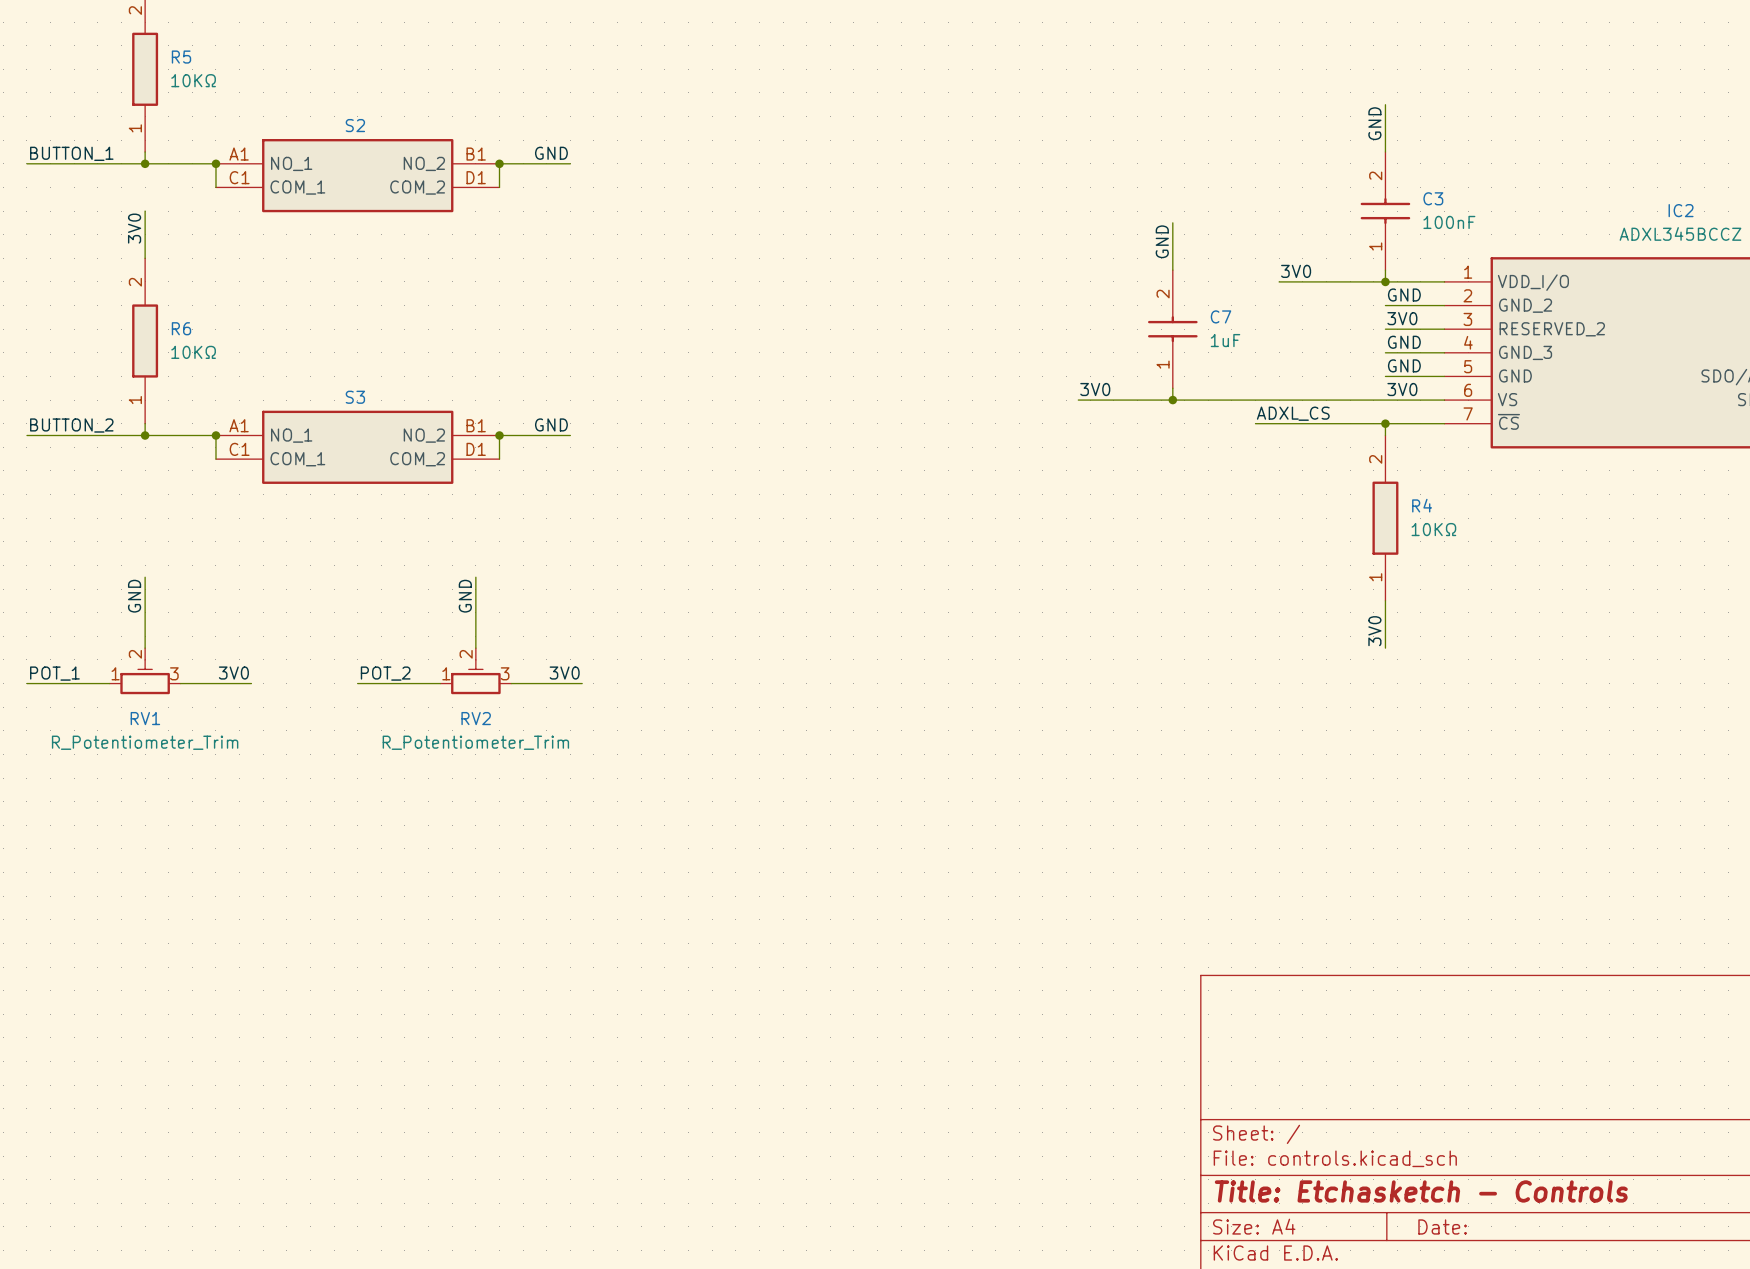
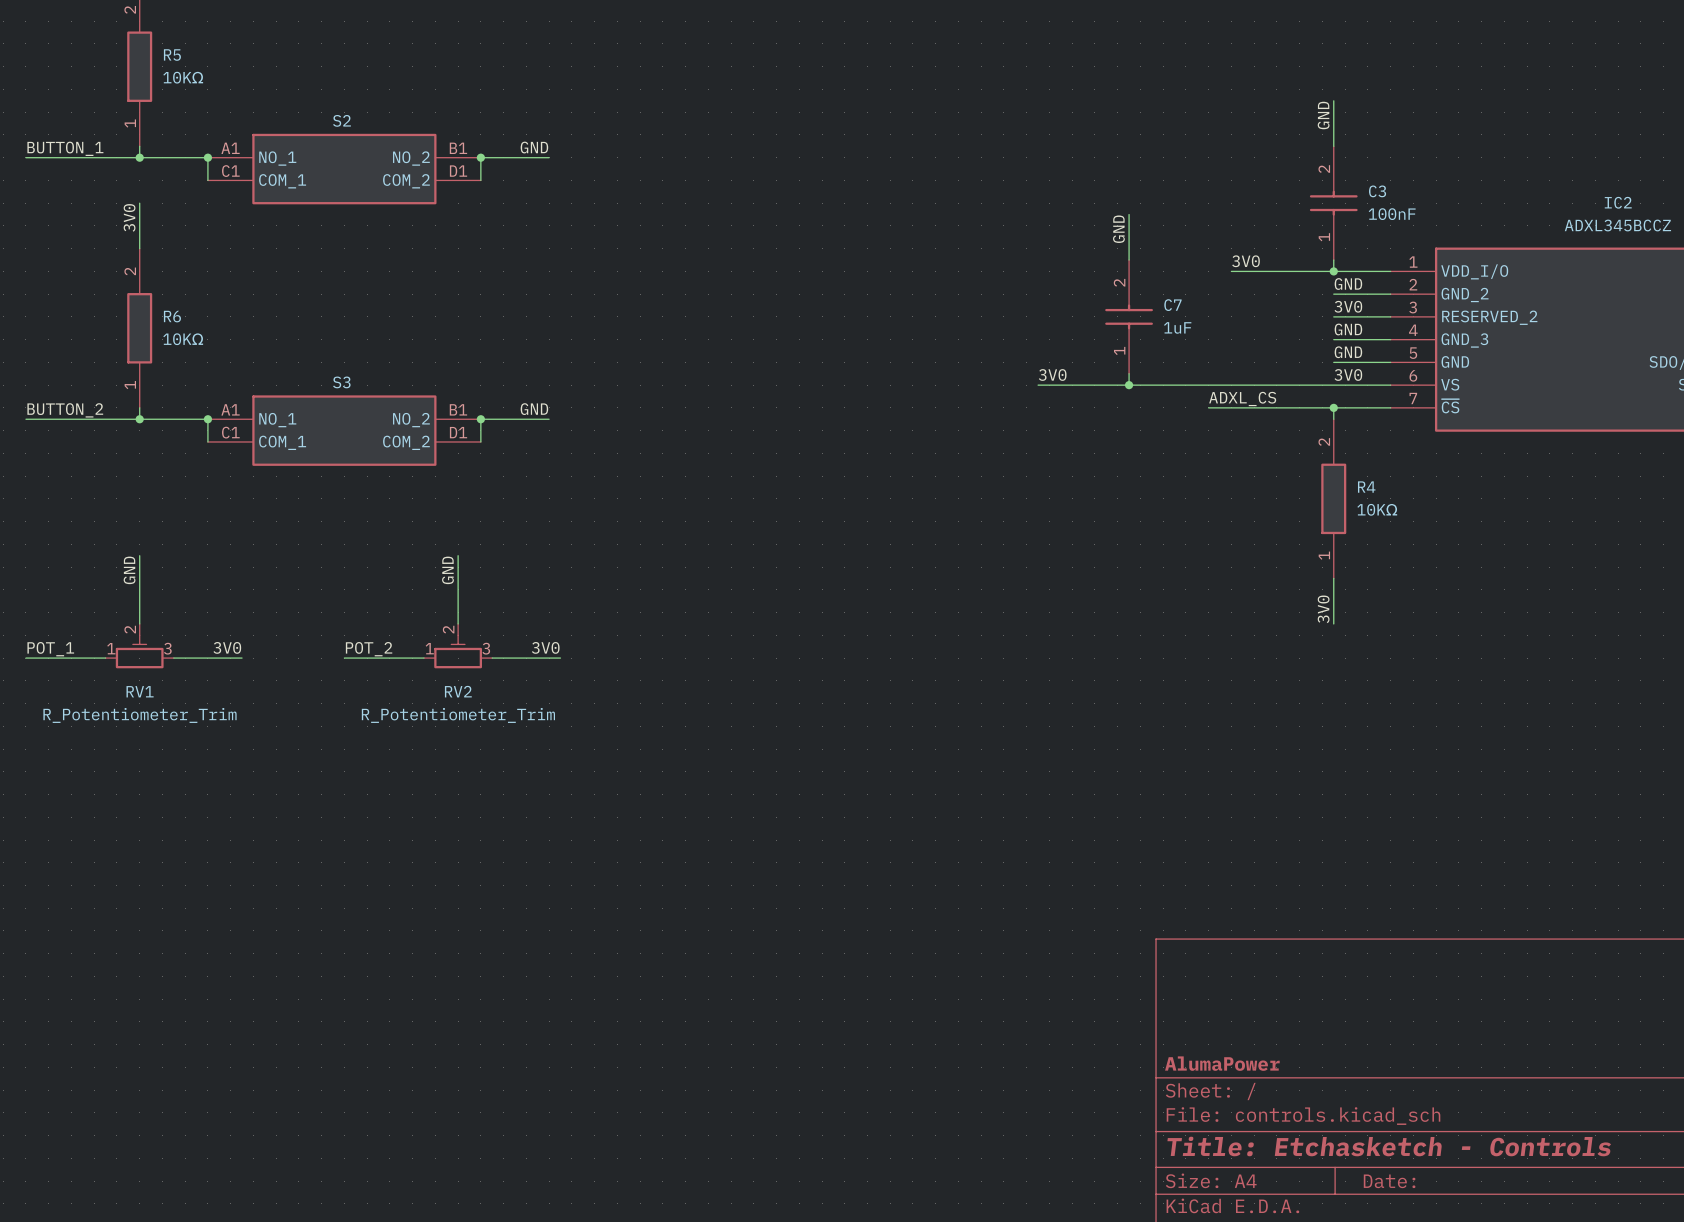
title block: none -> AlumaPower (1222, 1063)

